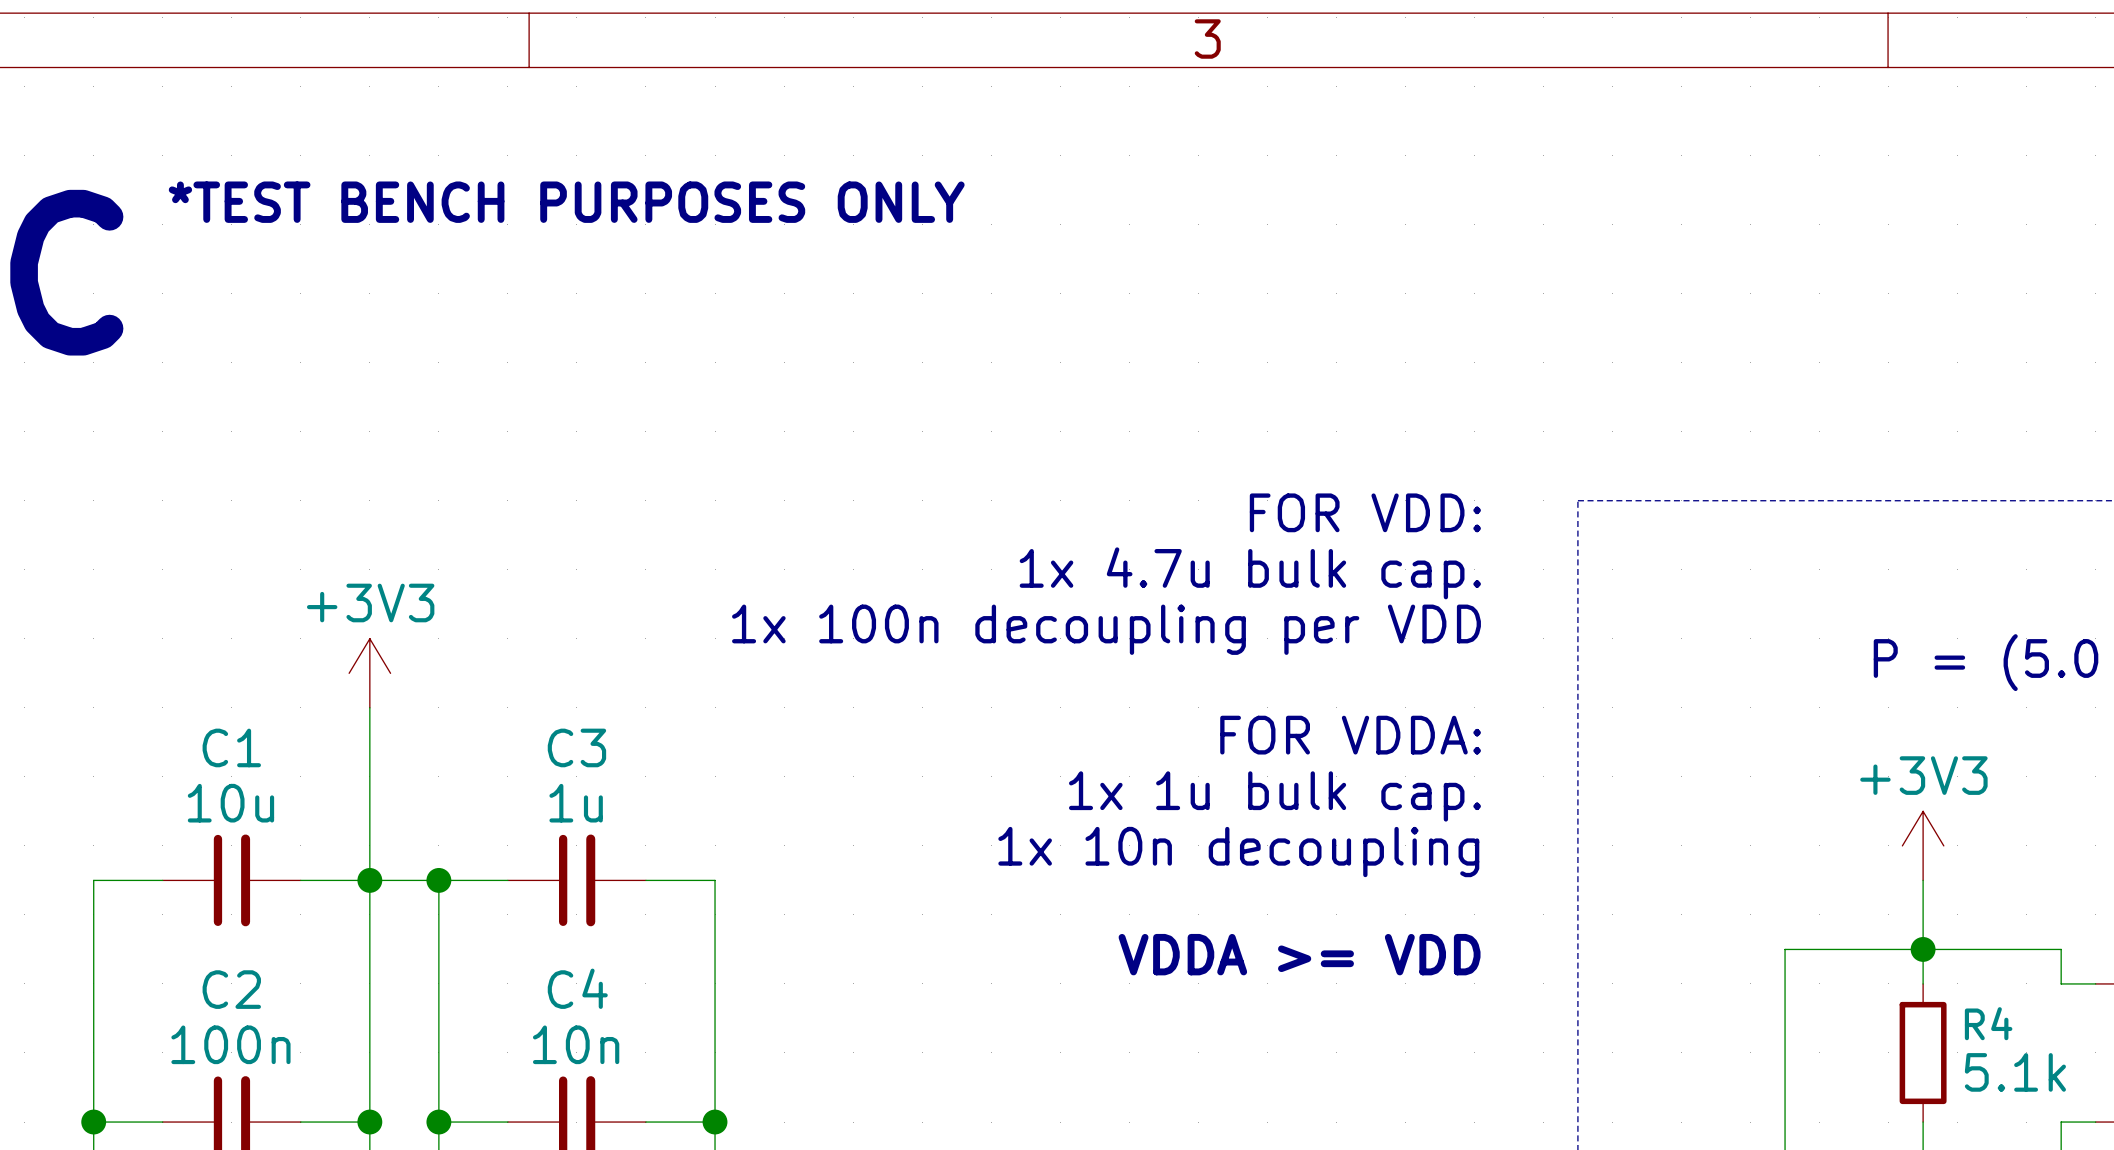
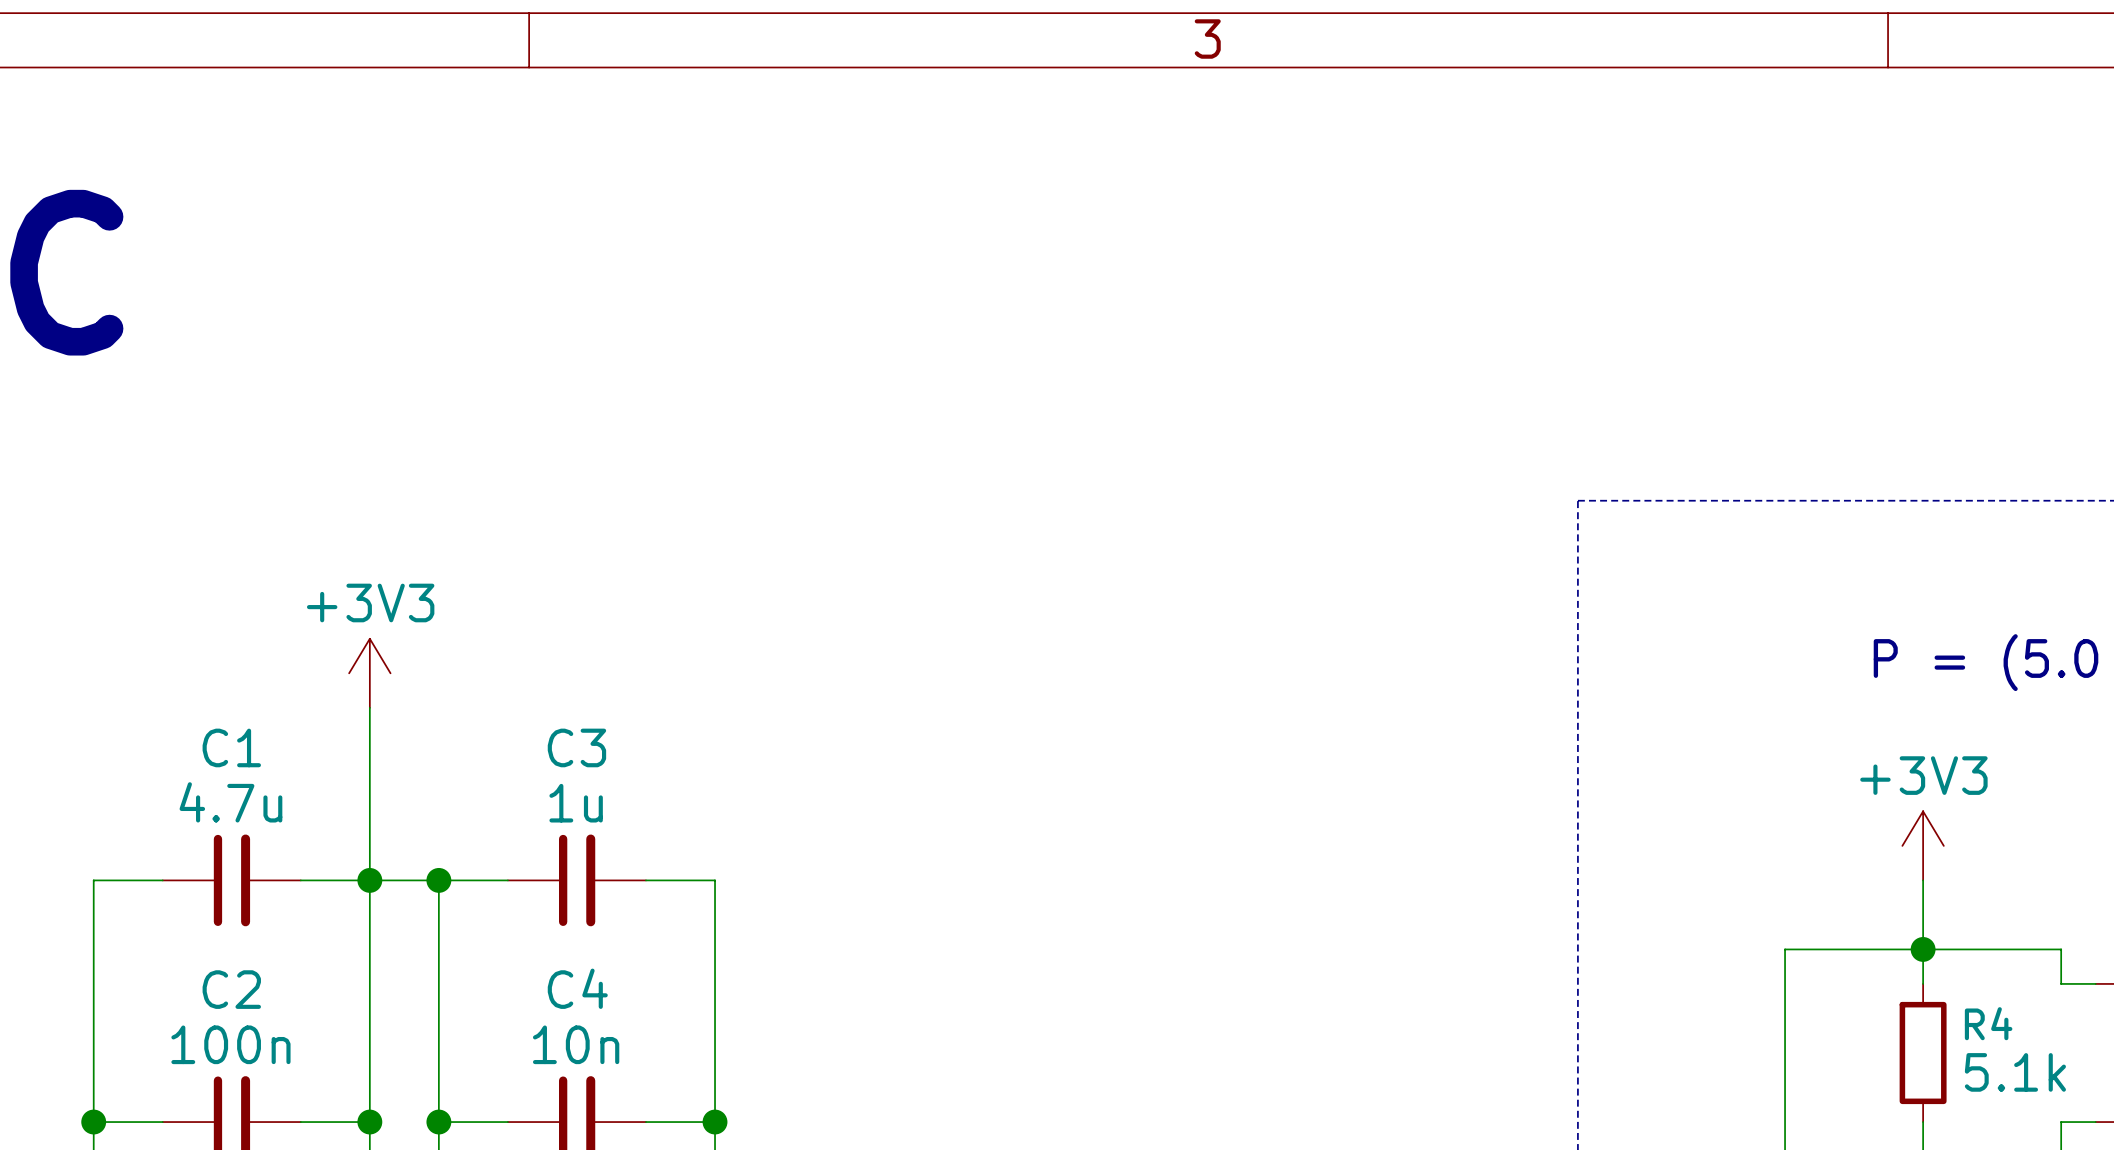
text: *TEST BENCH PURPOSES ONLY (566, 202) -> none
text: FOR VDD: (1365, 512) -> none
text: 1x 4.7u bulk cap. (1250, 573) -> none
text: 1x 100n decoupling per VDD (1106, 629) -> none
text: FOR VDDA: (1350, 735) -> none
text: 1x 1u bulk cap. (1274, 796) -> none
C1 value: 10u (230, 803) -> 4.7u (230, 802)
text: 1x 10n decoupling (1238, 852) -> none
text: VDDA >= VDD (1299, 954) -> none

